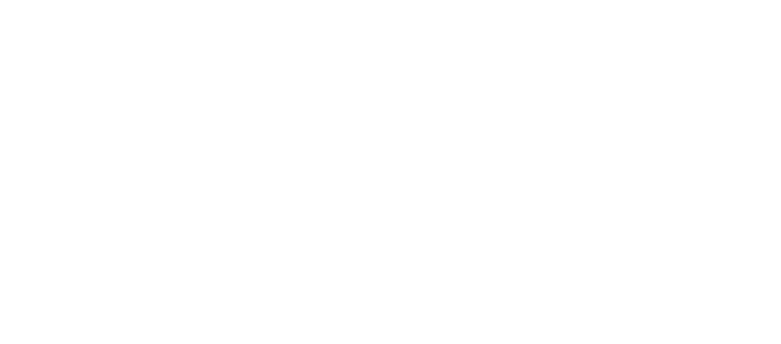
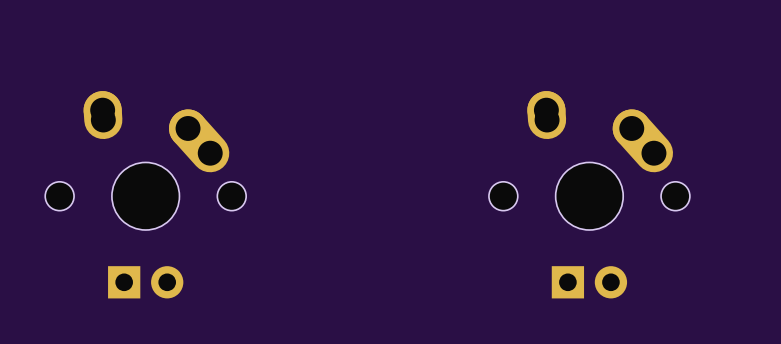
part: none -> (145, 194)
part: none -> (589, 194)

